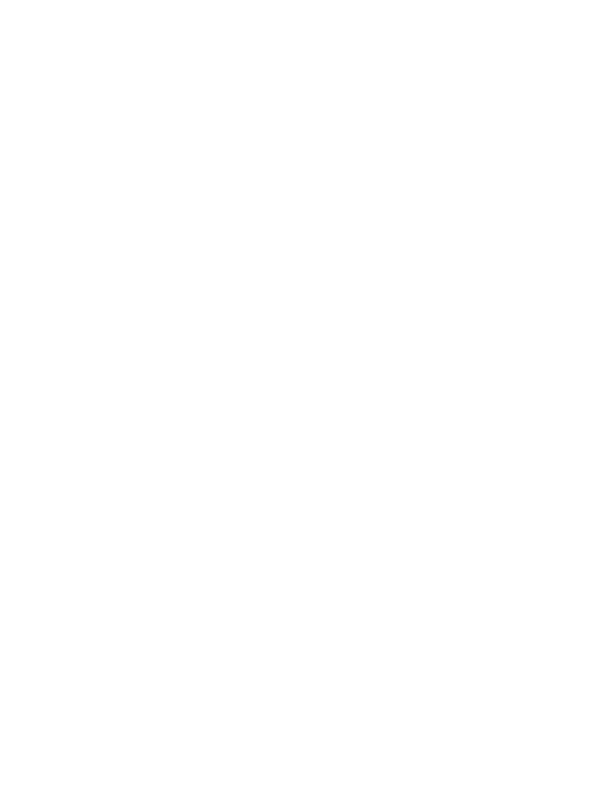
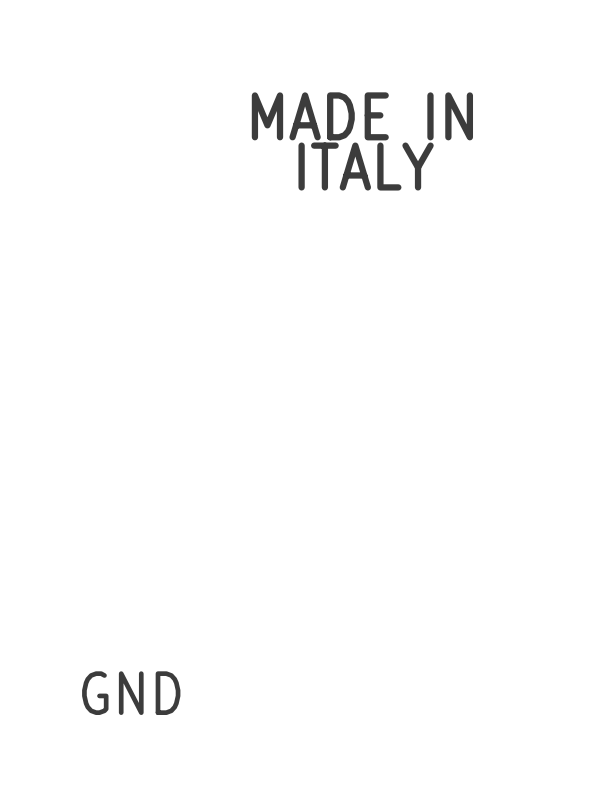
text: none -> MADE IN (362, 116)
text: none -> ITALY (366, 166)
text: none -> GND (131, 693)

